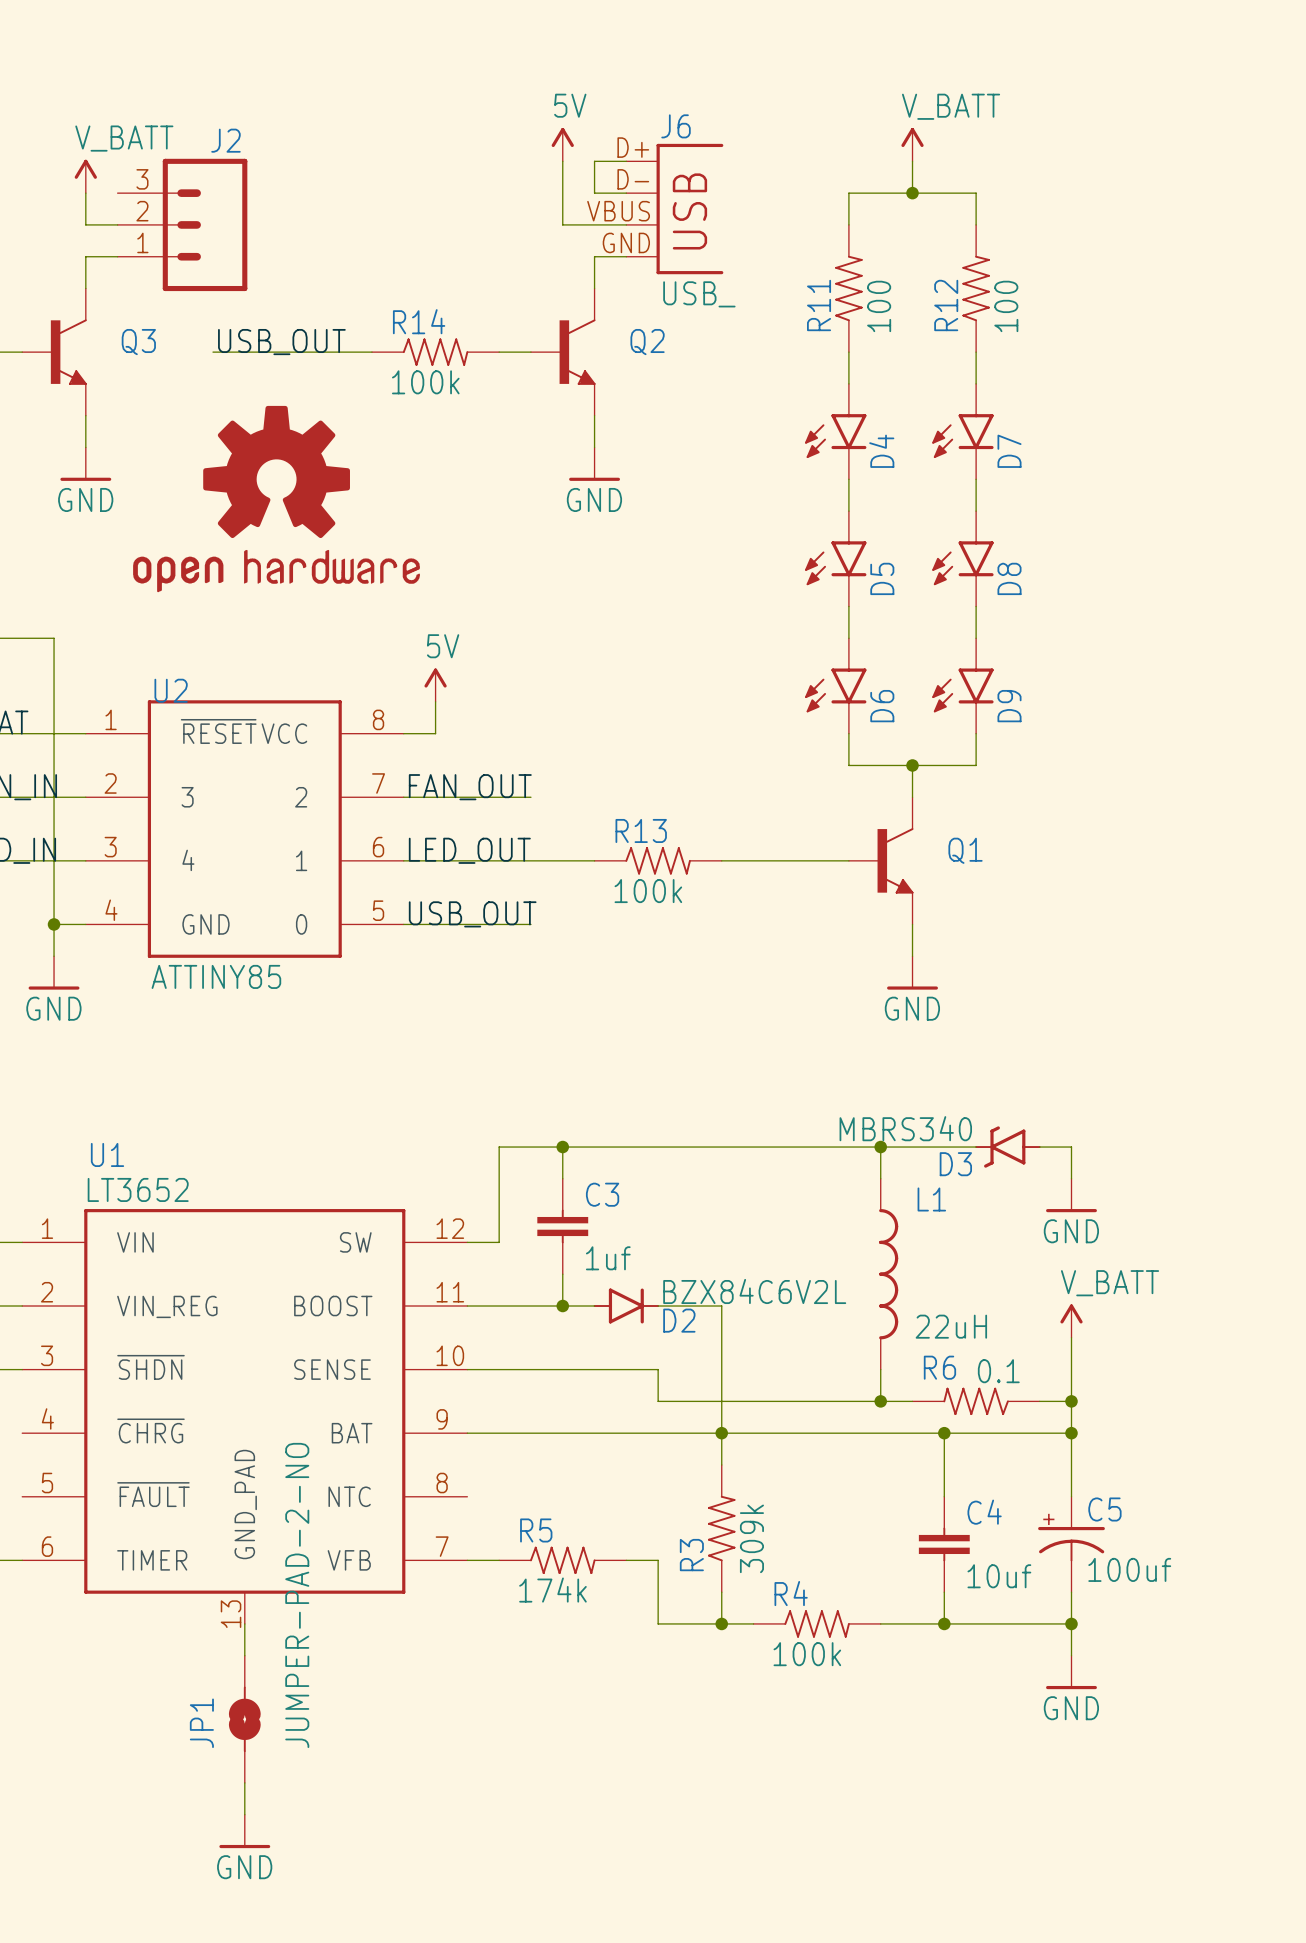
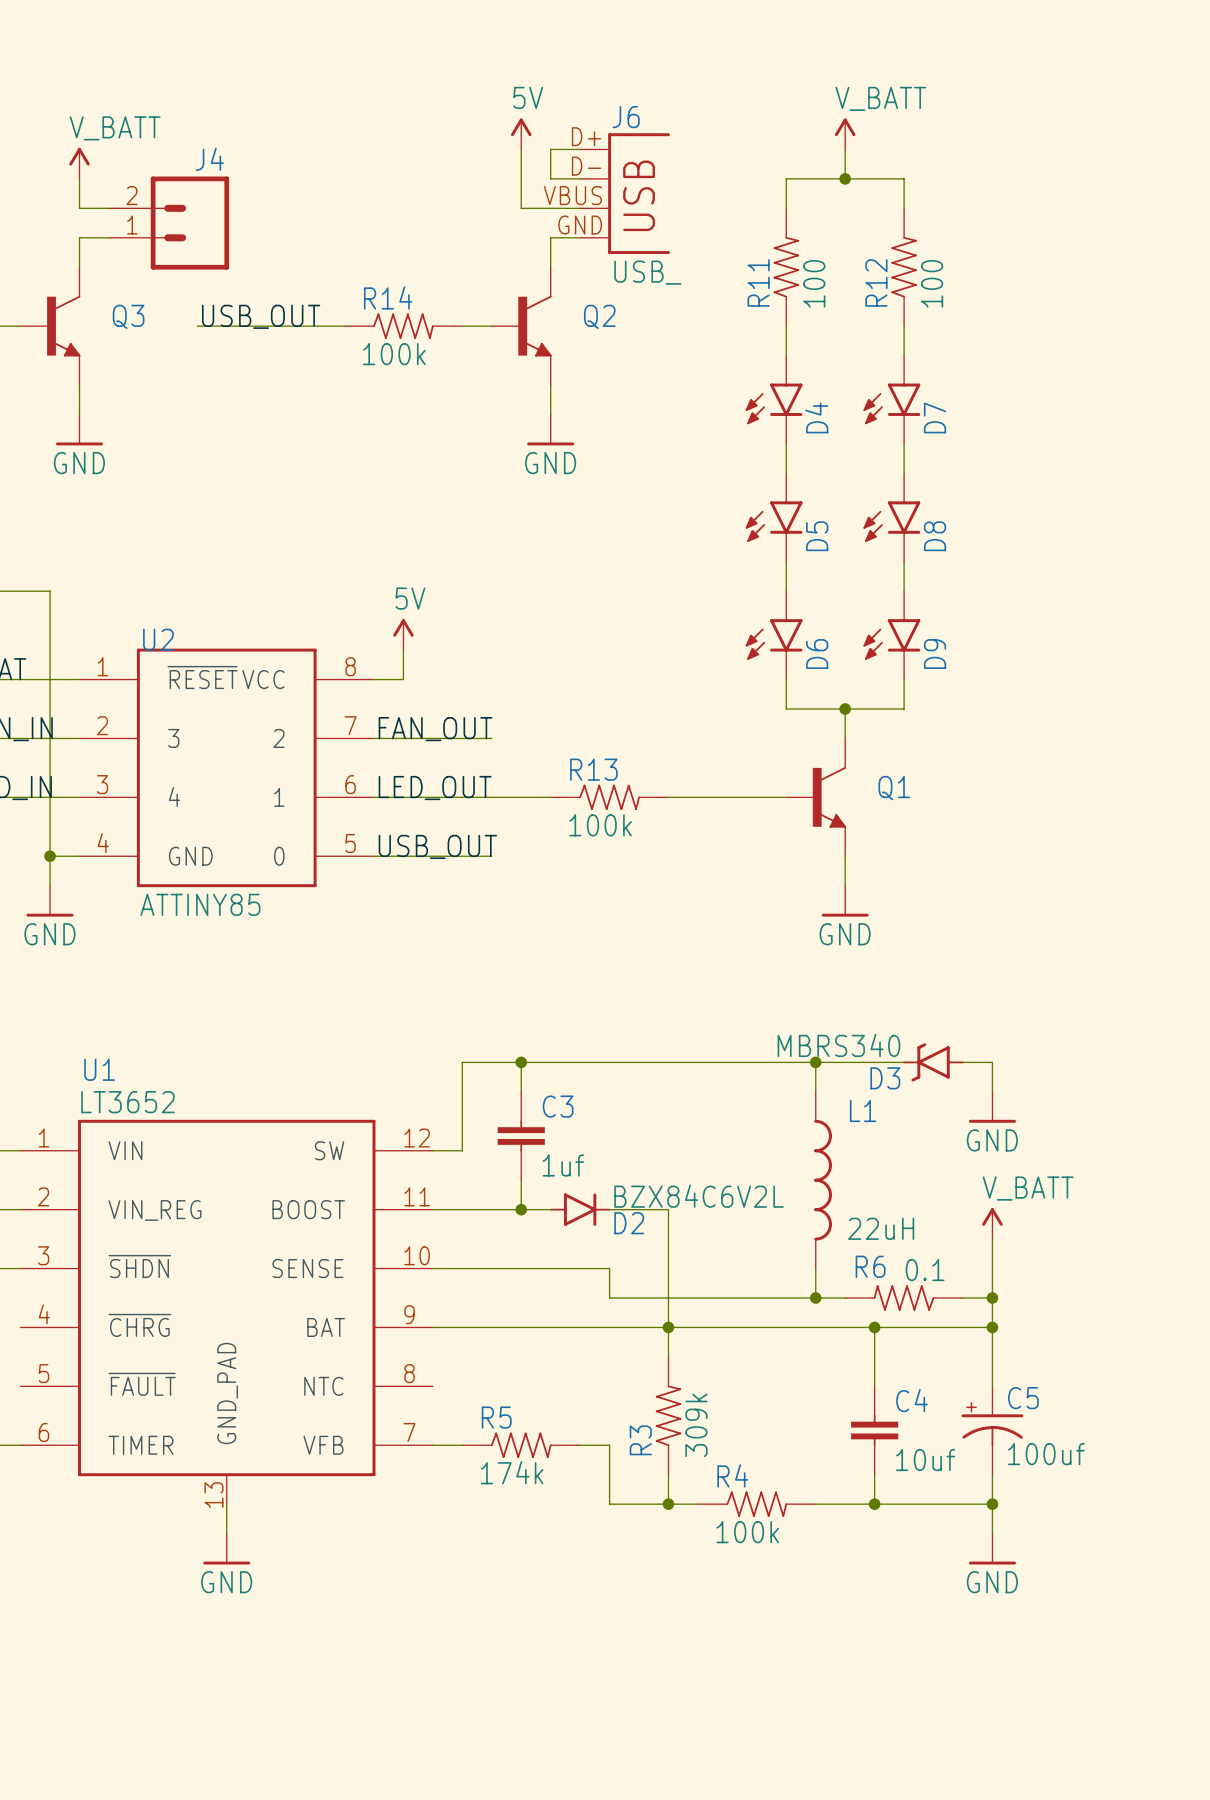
J2: (182, 224) -> none
J4: none -> (169, 223)
part: (276, 499) -> none
JP1: JUMPER-PAD-2-NO (244, 1719) -> none
wire: (244, 1782) (244, 1814) -> none
power symbol position: GND (244, 1831) -> GND (226, 1549)

